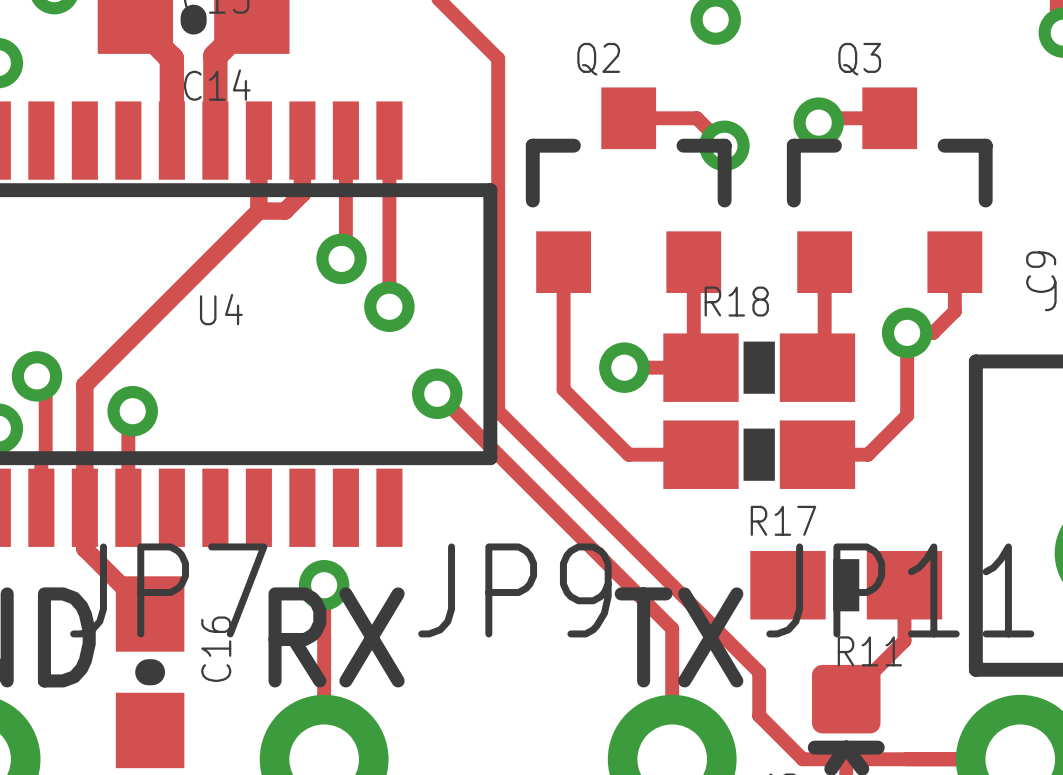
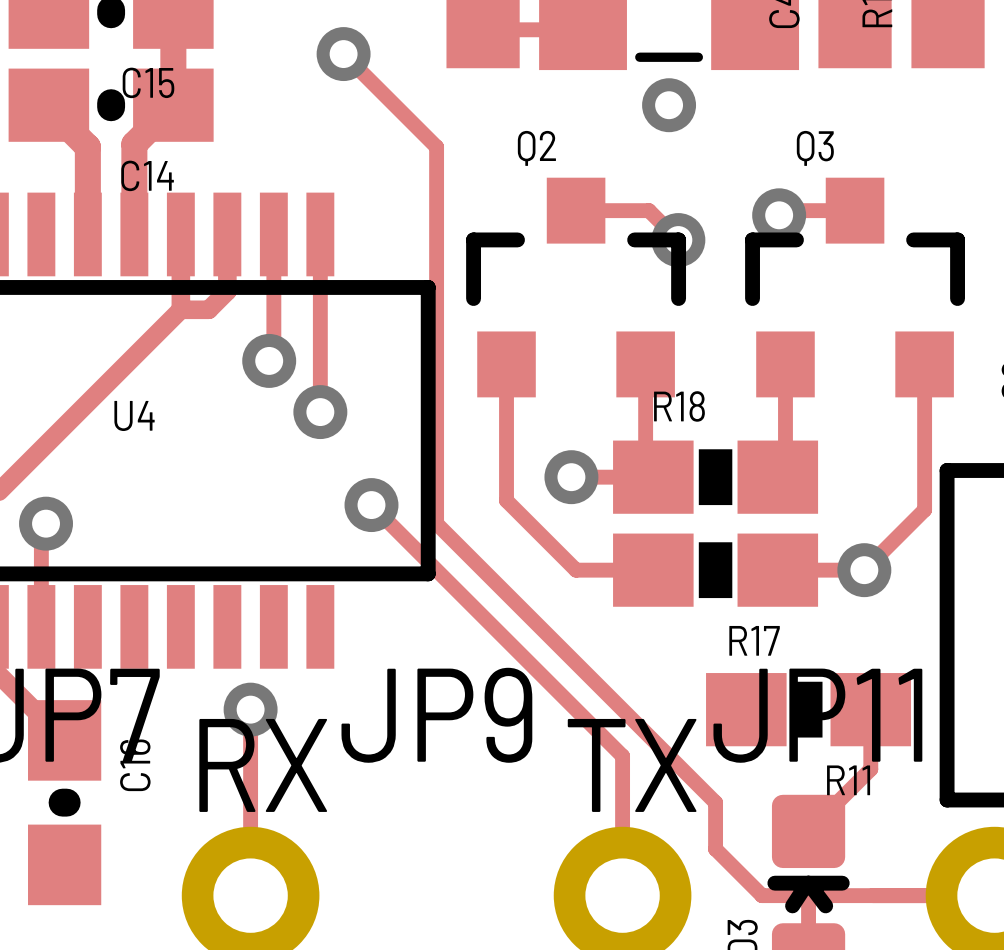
track: (954, 311) (933, 332) (907, 332) (907, 415) (867, 454) -> (924, 416) (924, 509) (864, 570) (831, 570)
via position: (907, 332) -> (864, 570)

